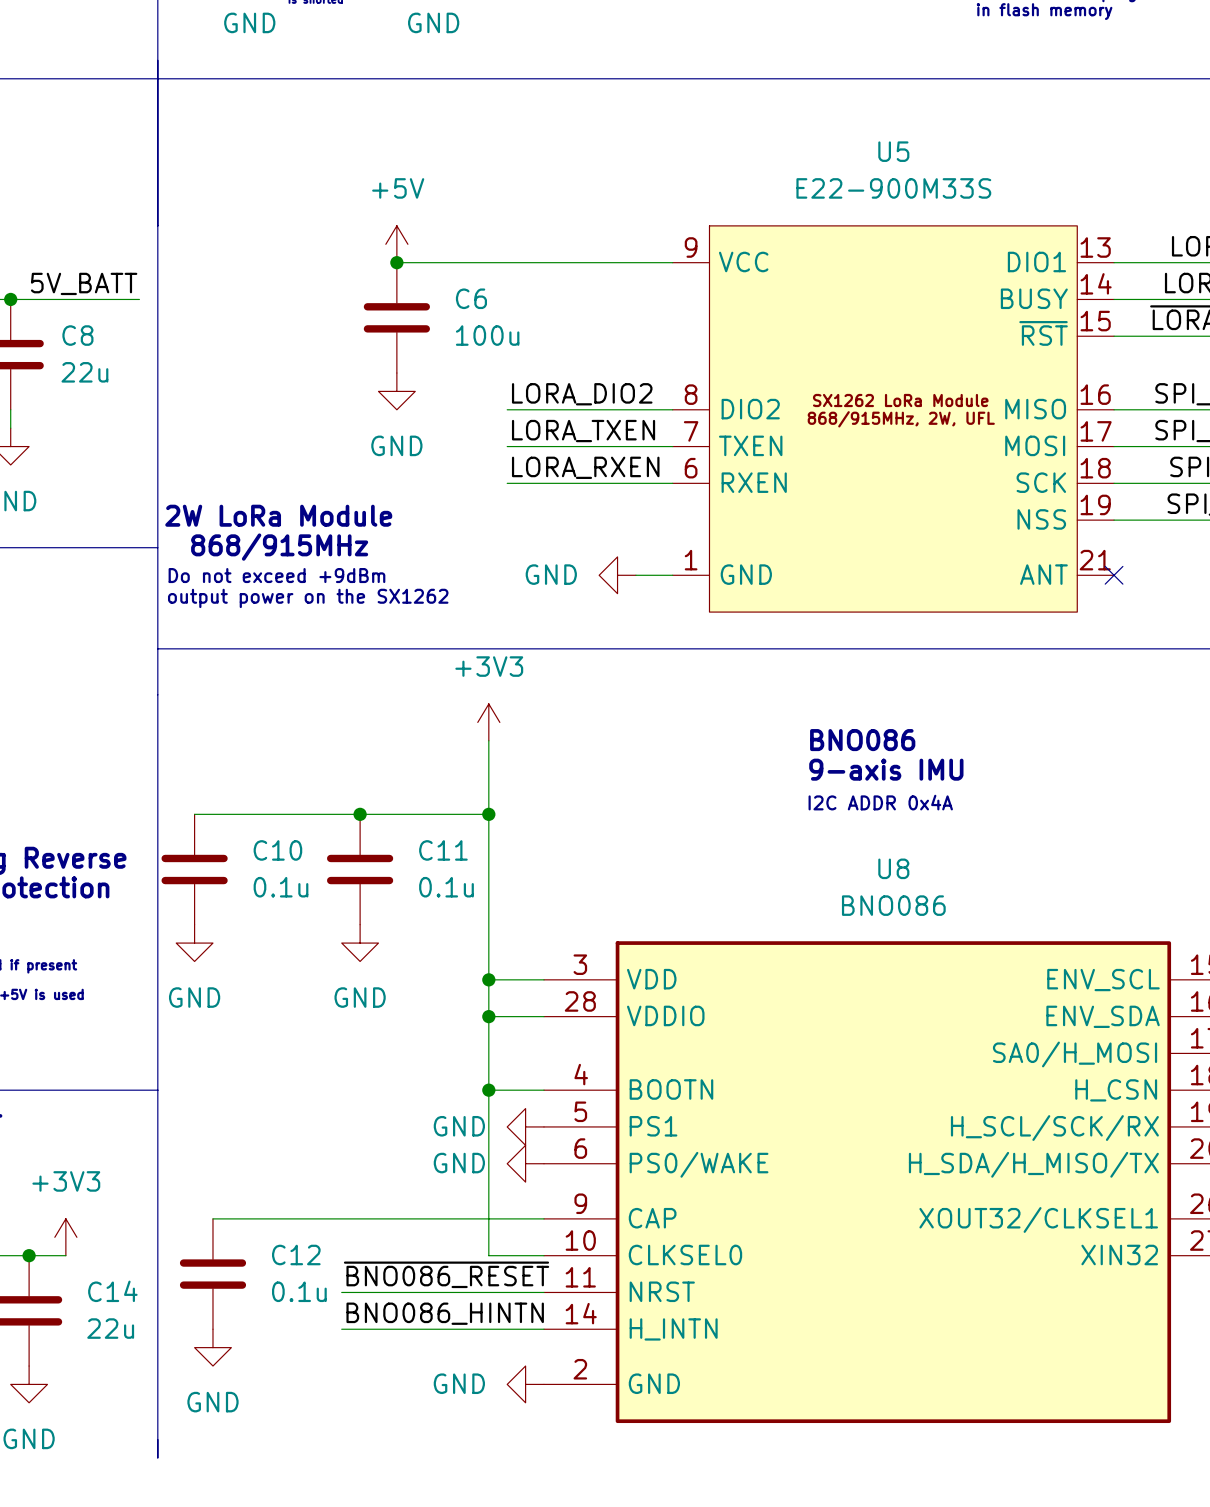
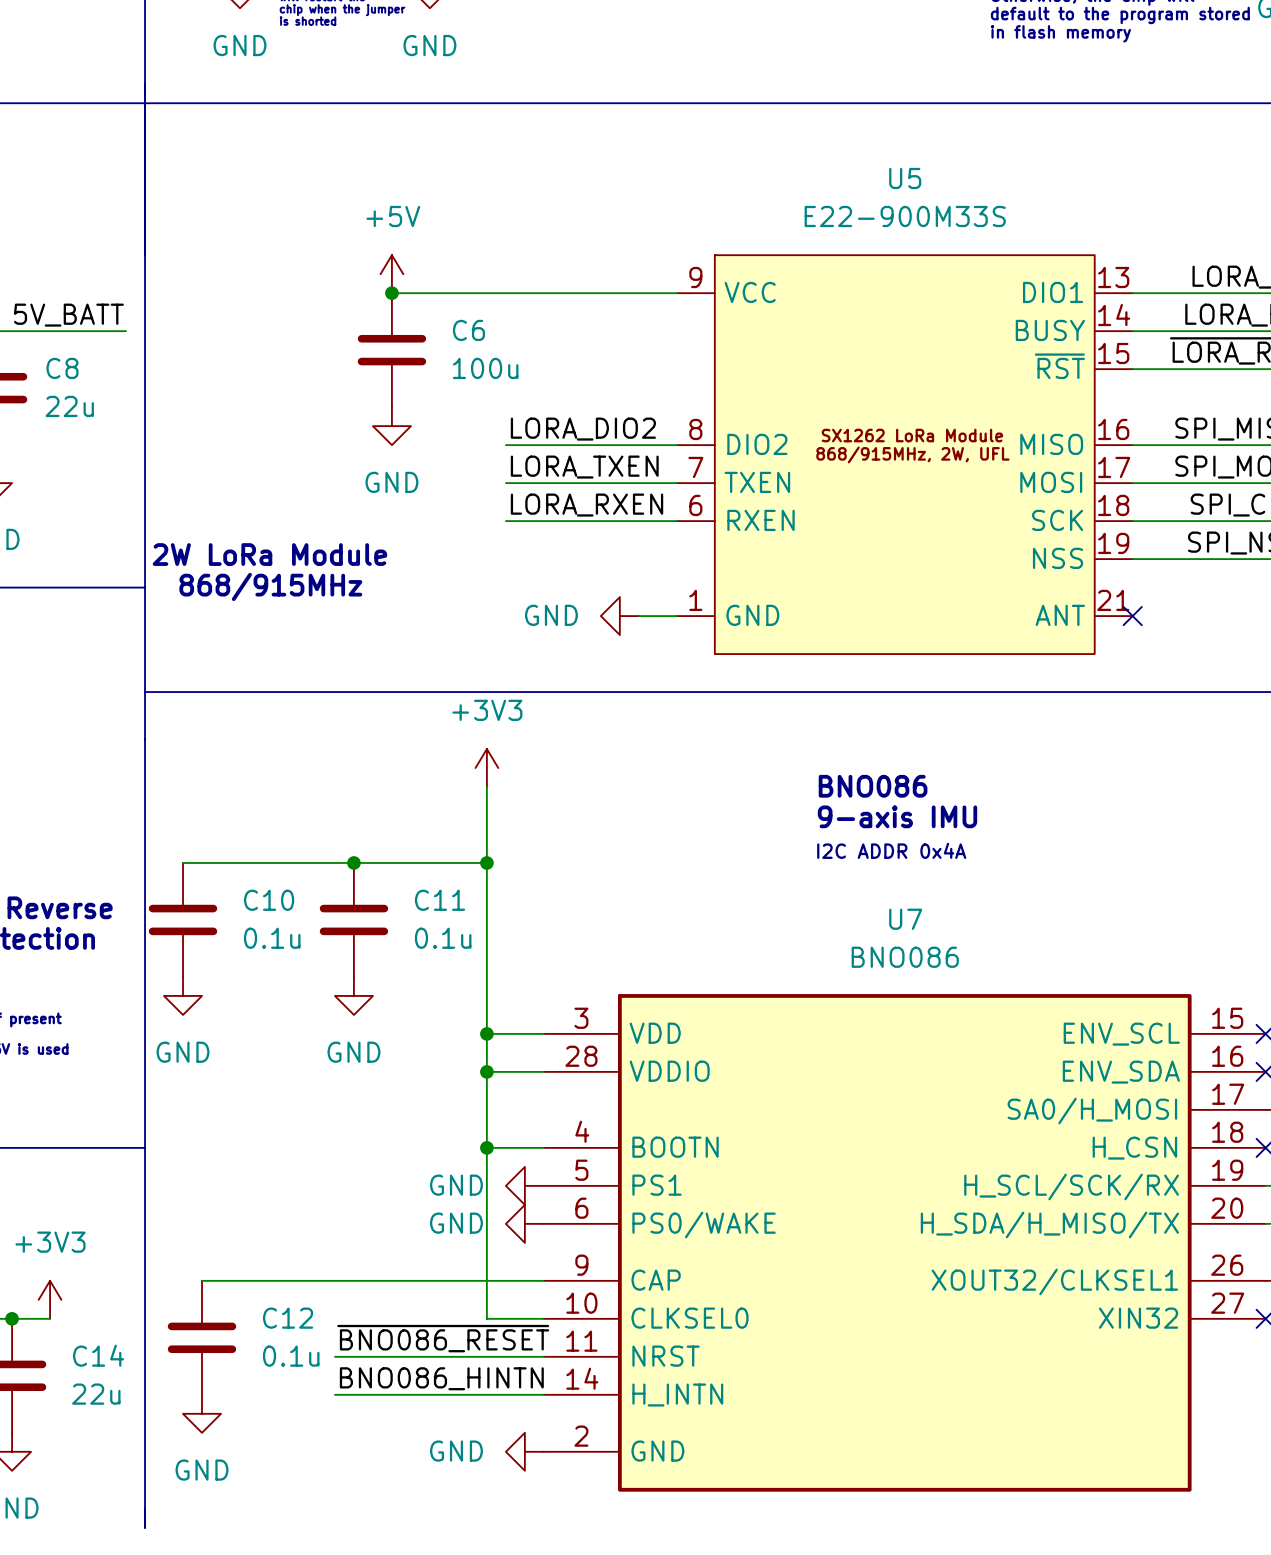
text: Do not exceed +9dBm (276, 575) -> none
text: output power on the SX1262 (308, 598) -> none
U8 name: U8 (893, 868) -> U7 (905, 919)

